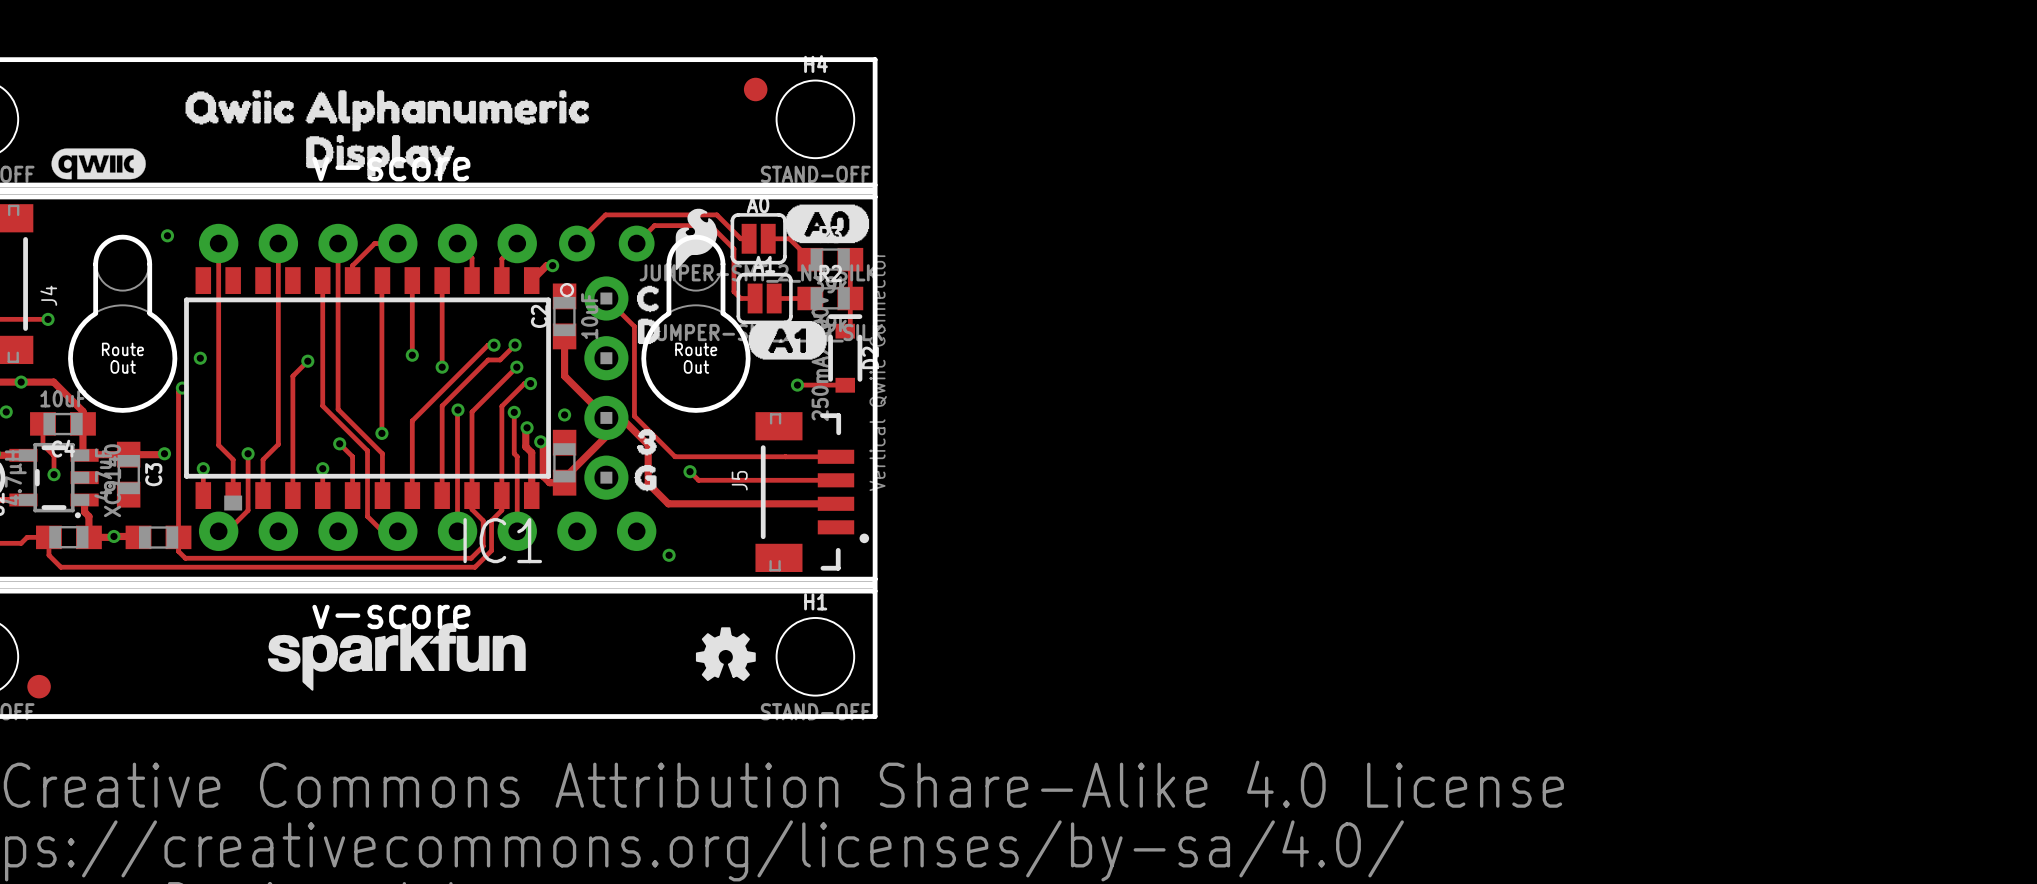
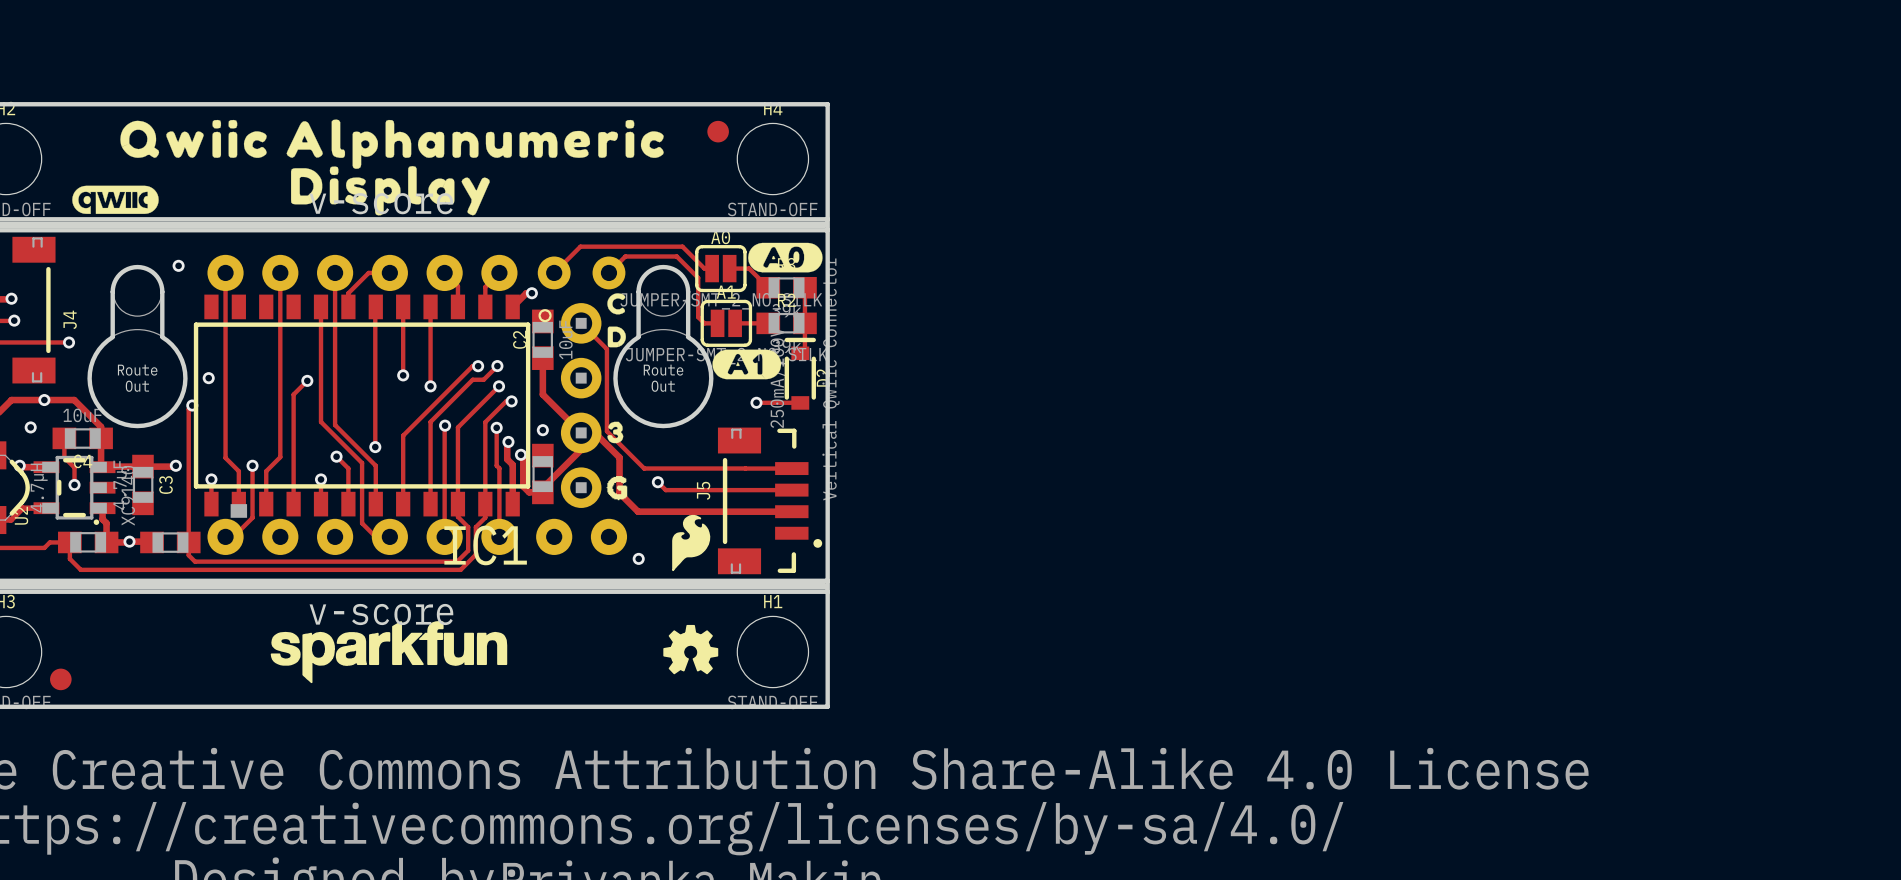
drawing shape: [185, 90, 589, 132] -> [120, 119, 664, 169]
drawing shape: [306, 135, 455, 177] -> [290, 166, 490, 216]
drawing shape: [785, 204, 870, 244] -> [748, 242, 823, 273]
drawing position: (696, 239) -> (691, 543)
drawing: none -> [607, 293, 626, 348]
drawing: [636, 285, 661, 345] -> none
drawing shape: [748, 321, 827, 360] -> [712, 349, 782, 380]
drawing: none -> [607, 421, 624, 444]
drawing: [636, 429, 657, 456] -> none

